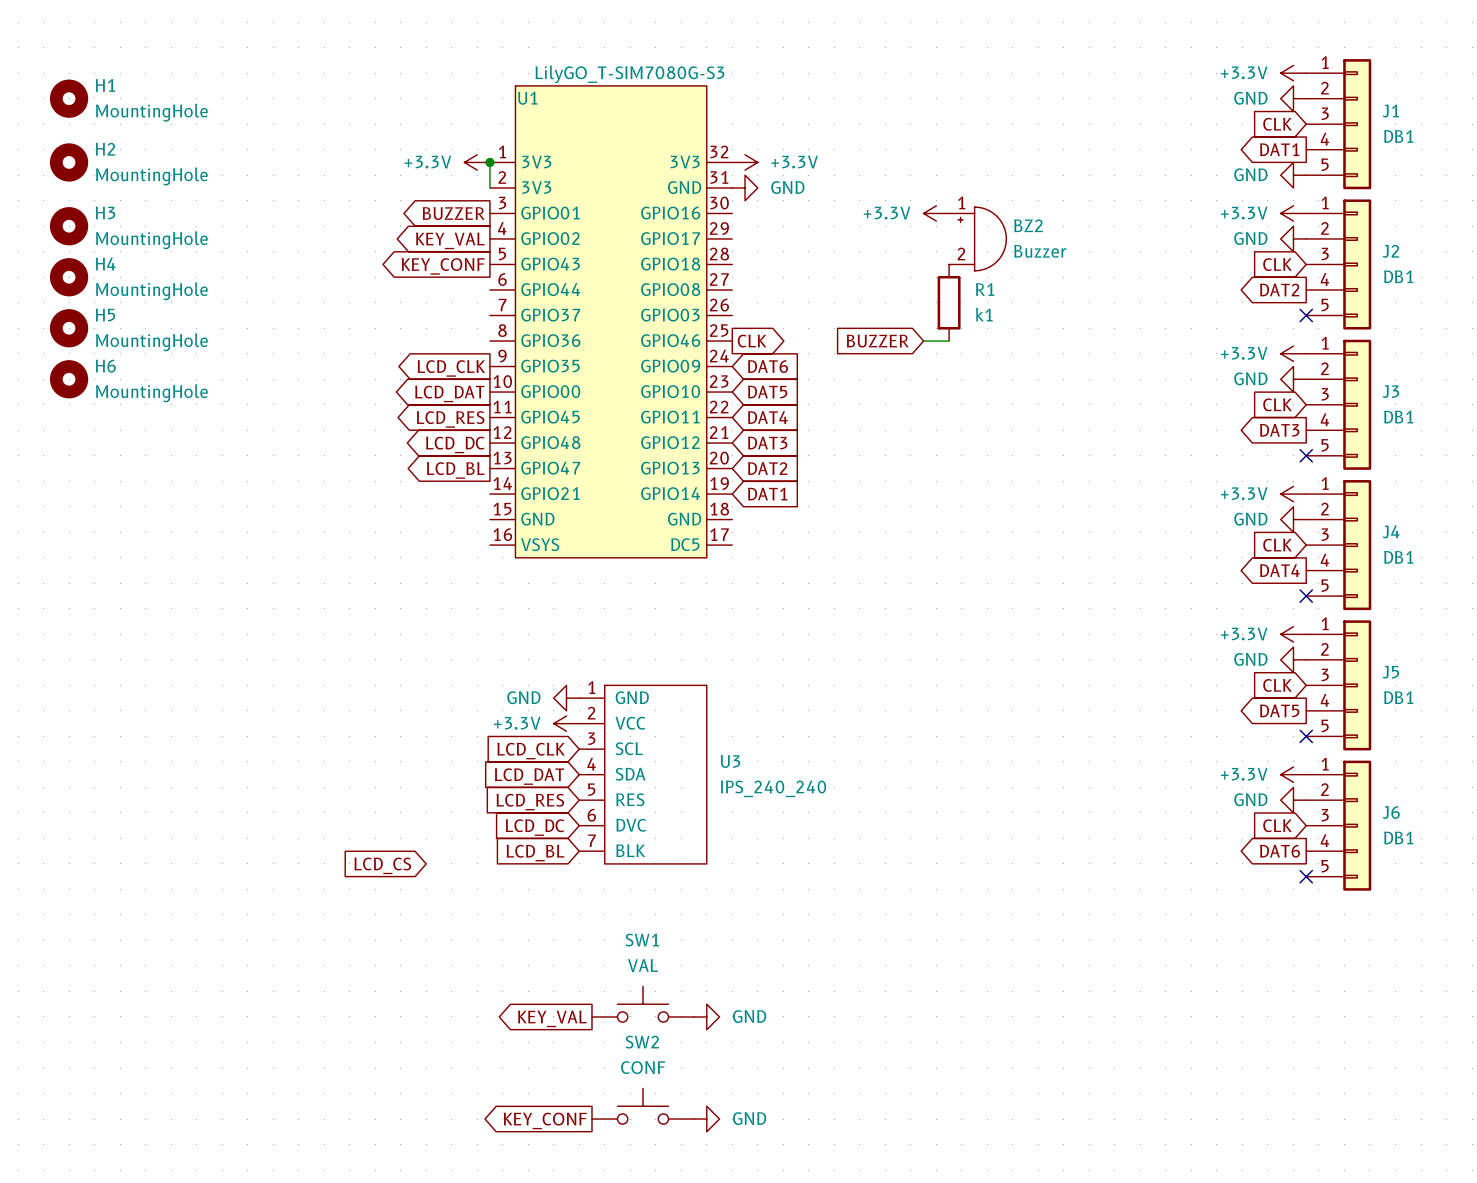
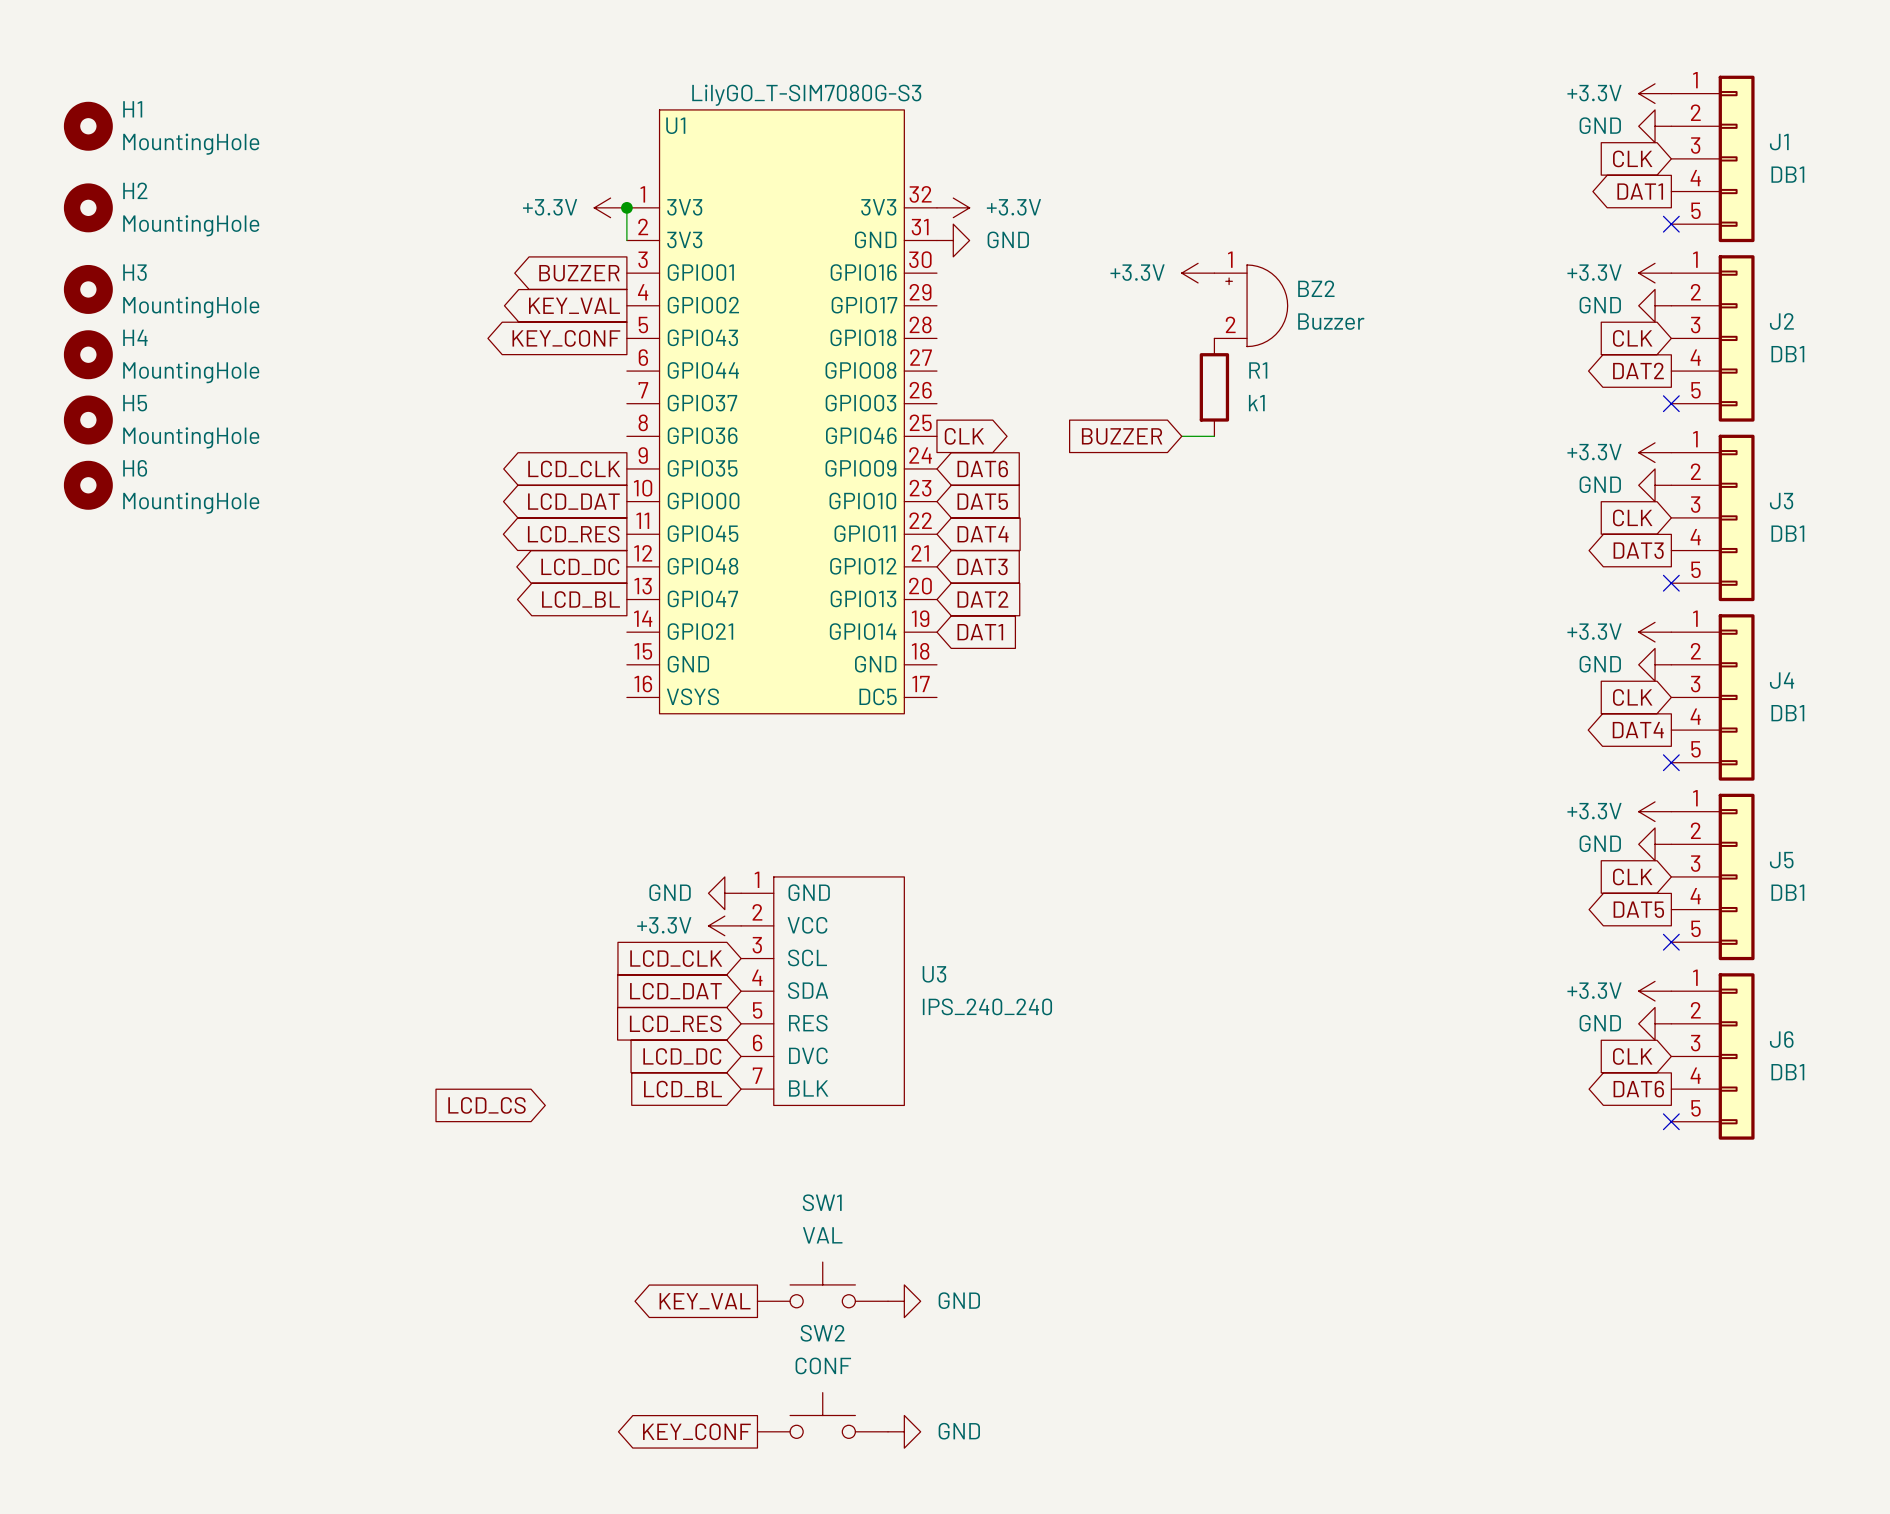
power symbol: GND (1293, 175) -> none
no-connect mark: none -> (1671, 224)

